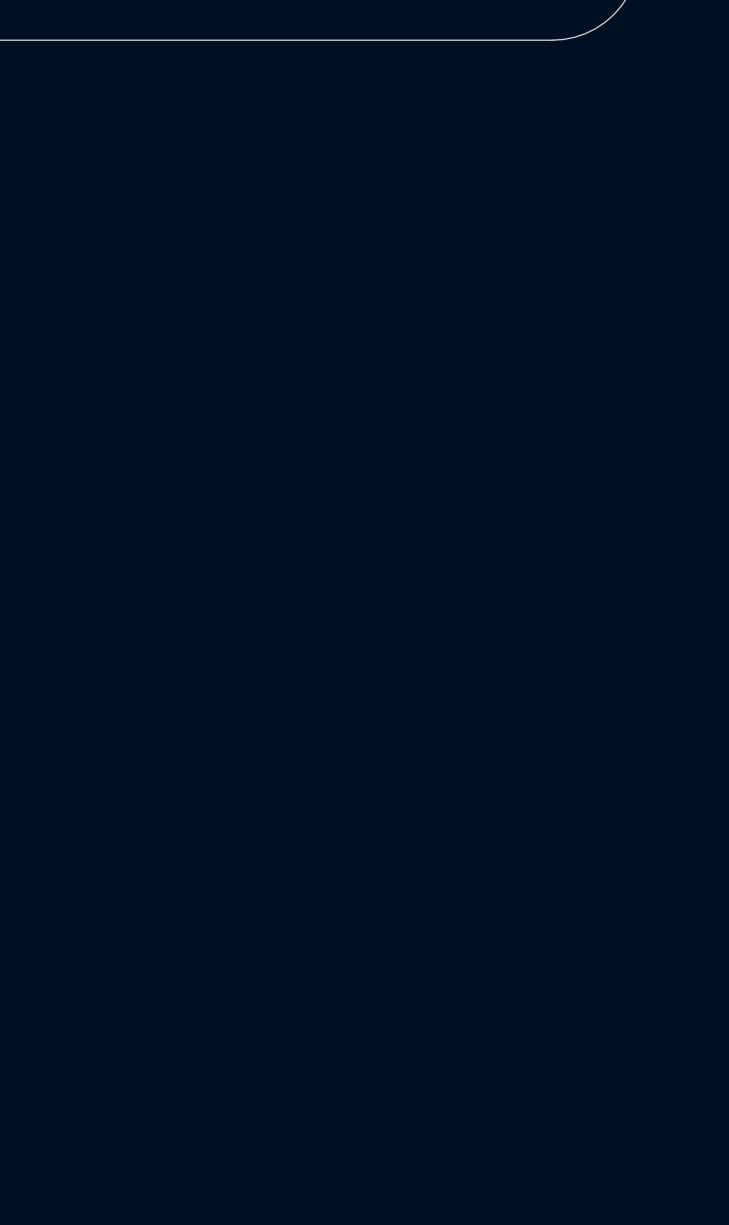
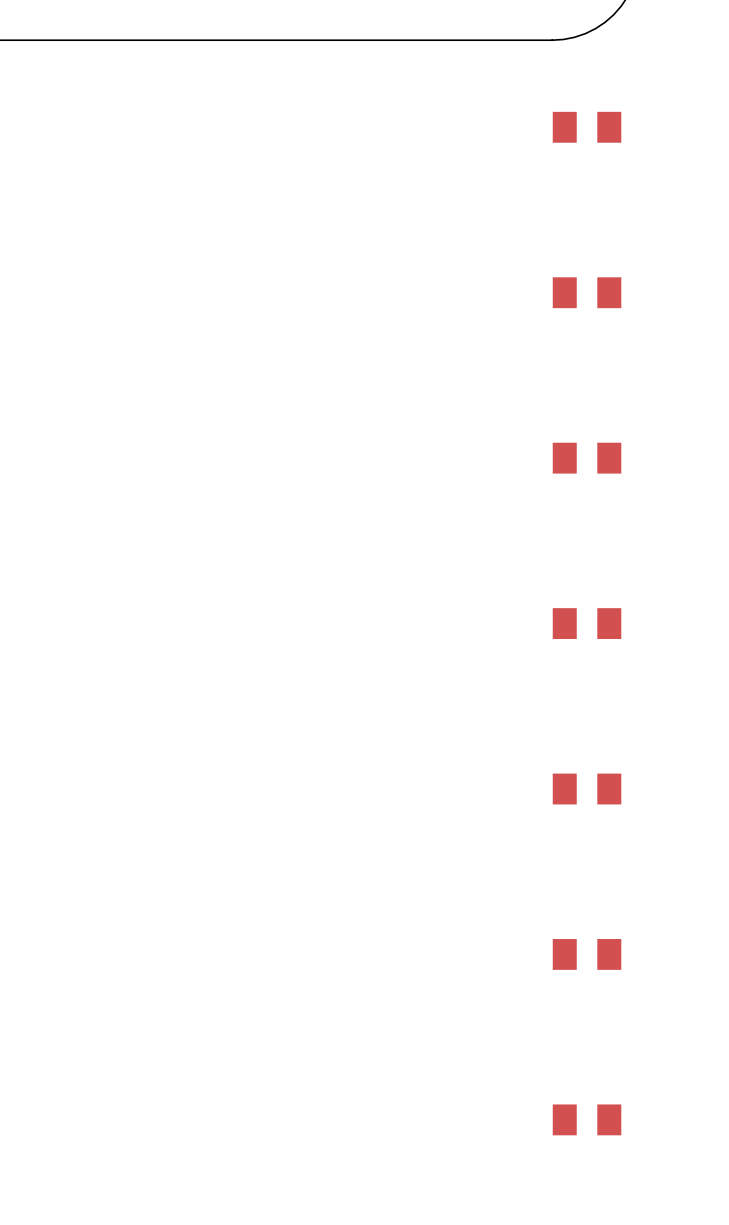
part: none -> (587, 127)
part: none -> (587, 292)
part: none -> (587, 458)
part: none -> (587, 623)
part: none -> (587, 789)
part: none -> (587, 954)
part: none -> (587, 1119)

